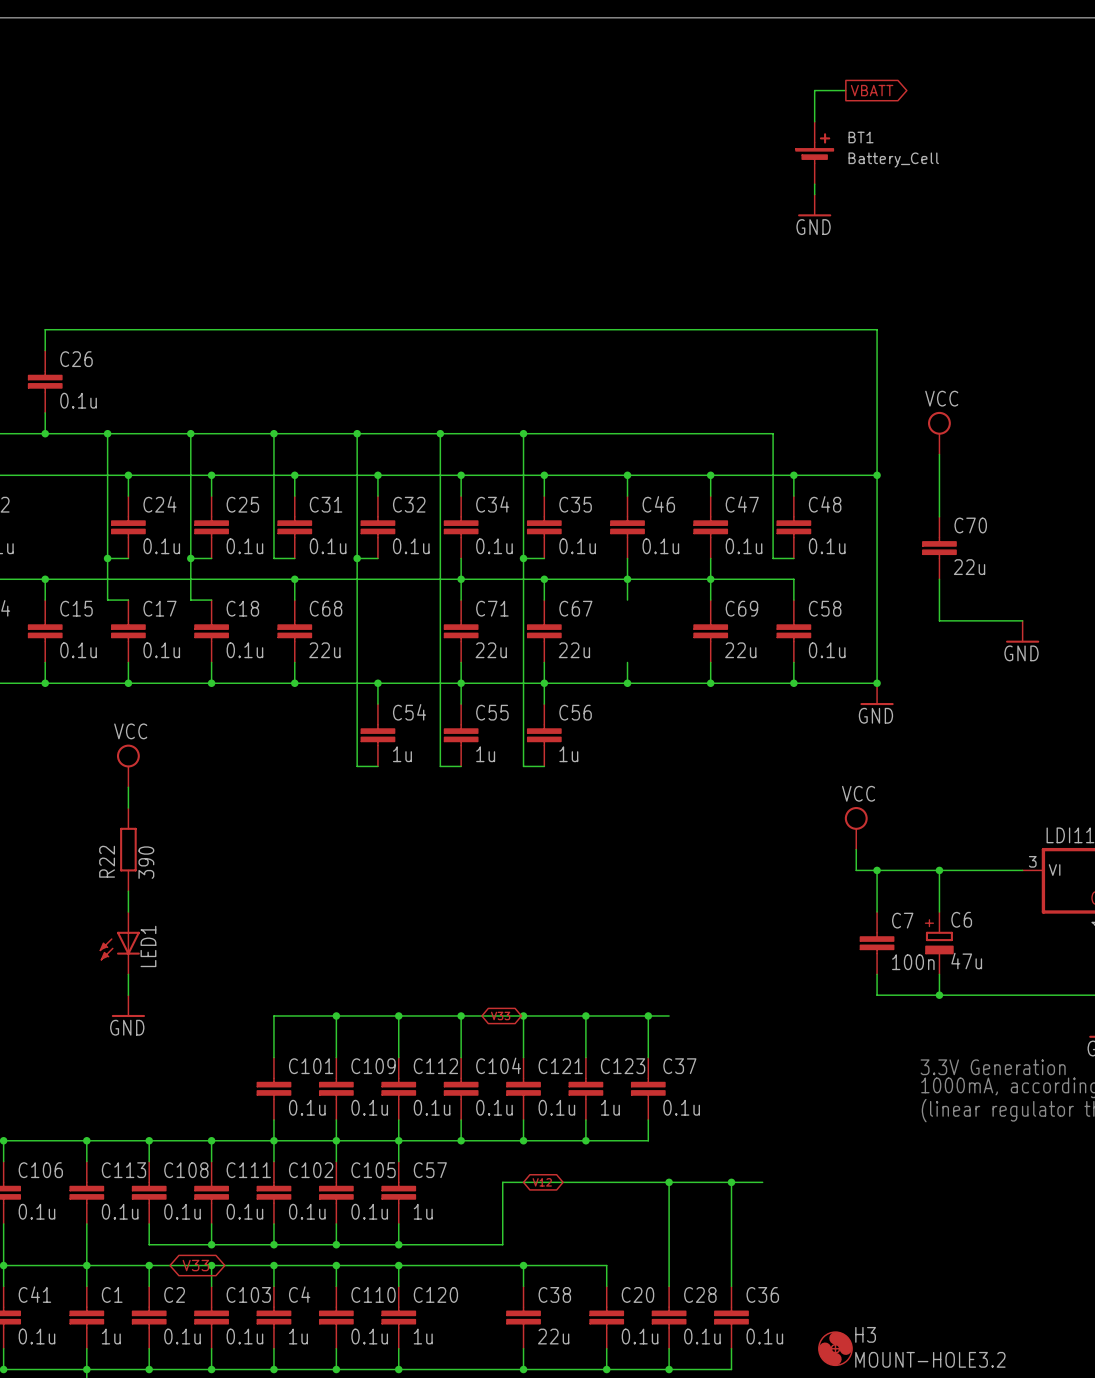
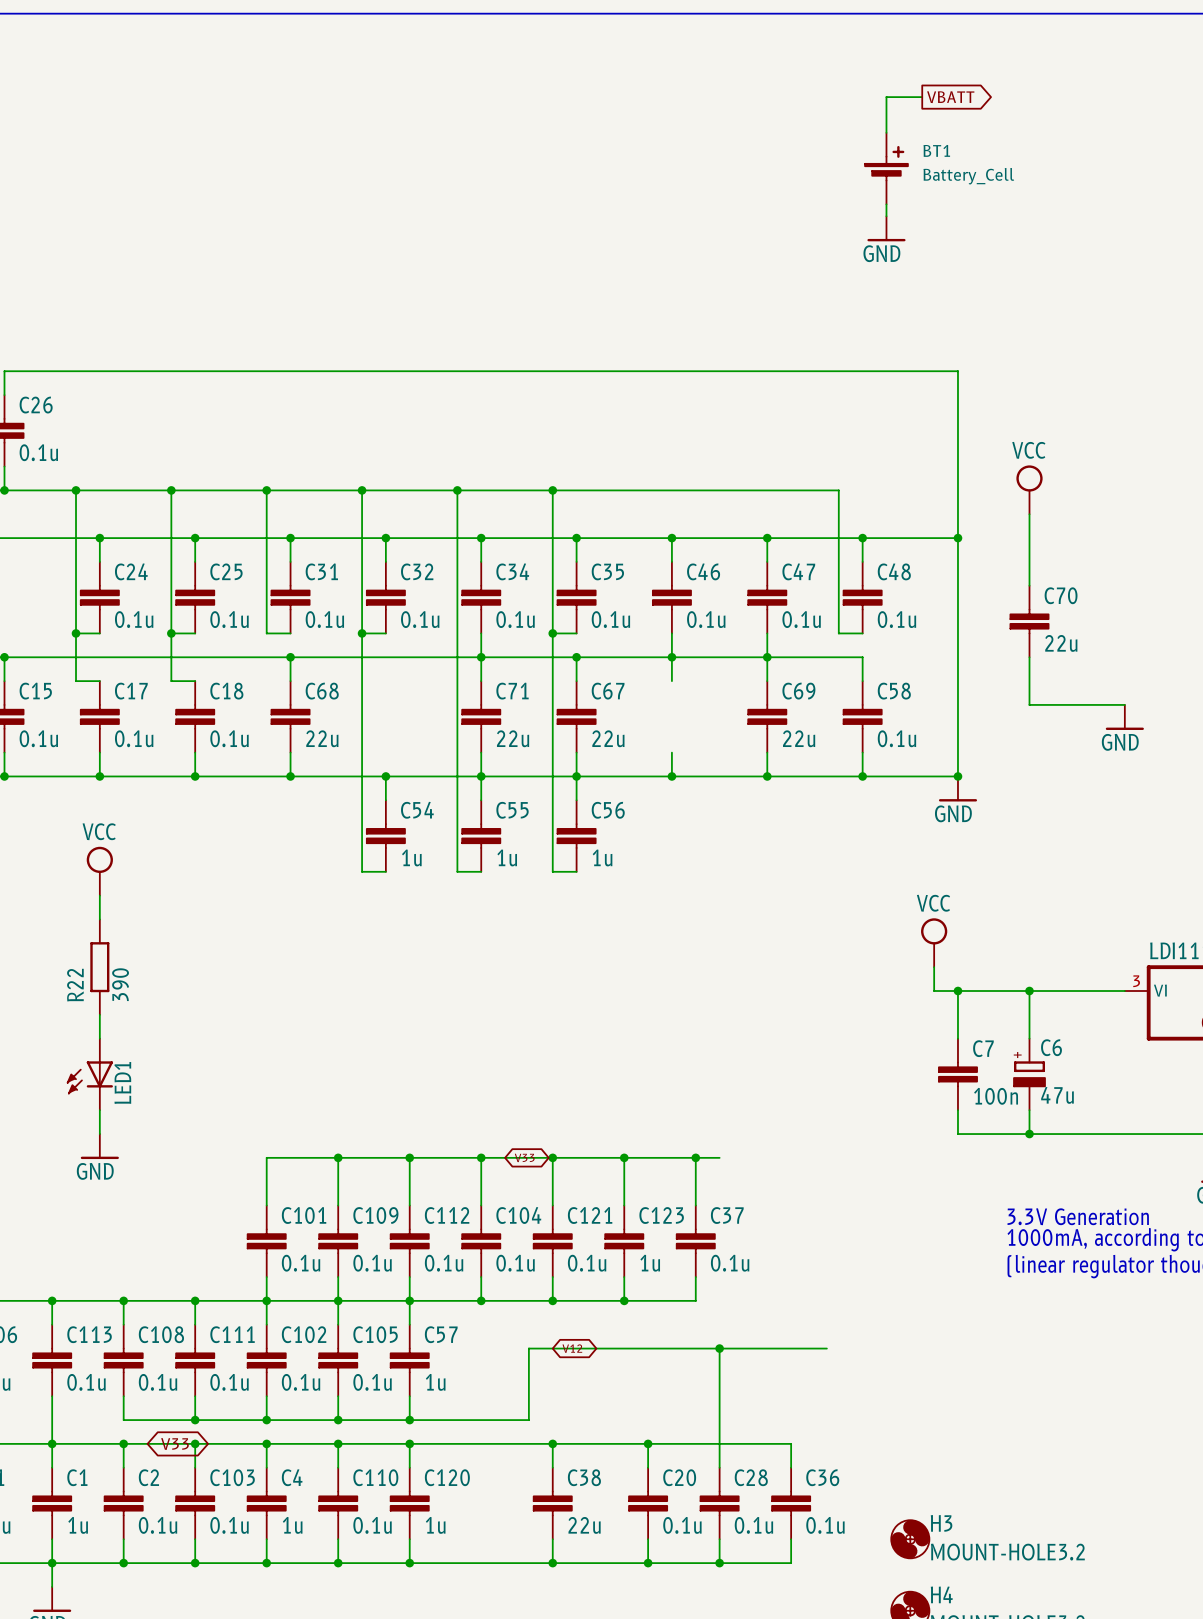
wire: (731, 1182) (731, 1265) -> (648, 1443) (791, 1443)
junction: (731, 1182) -> none
junction: none -> (648, 1443)

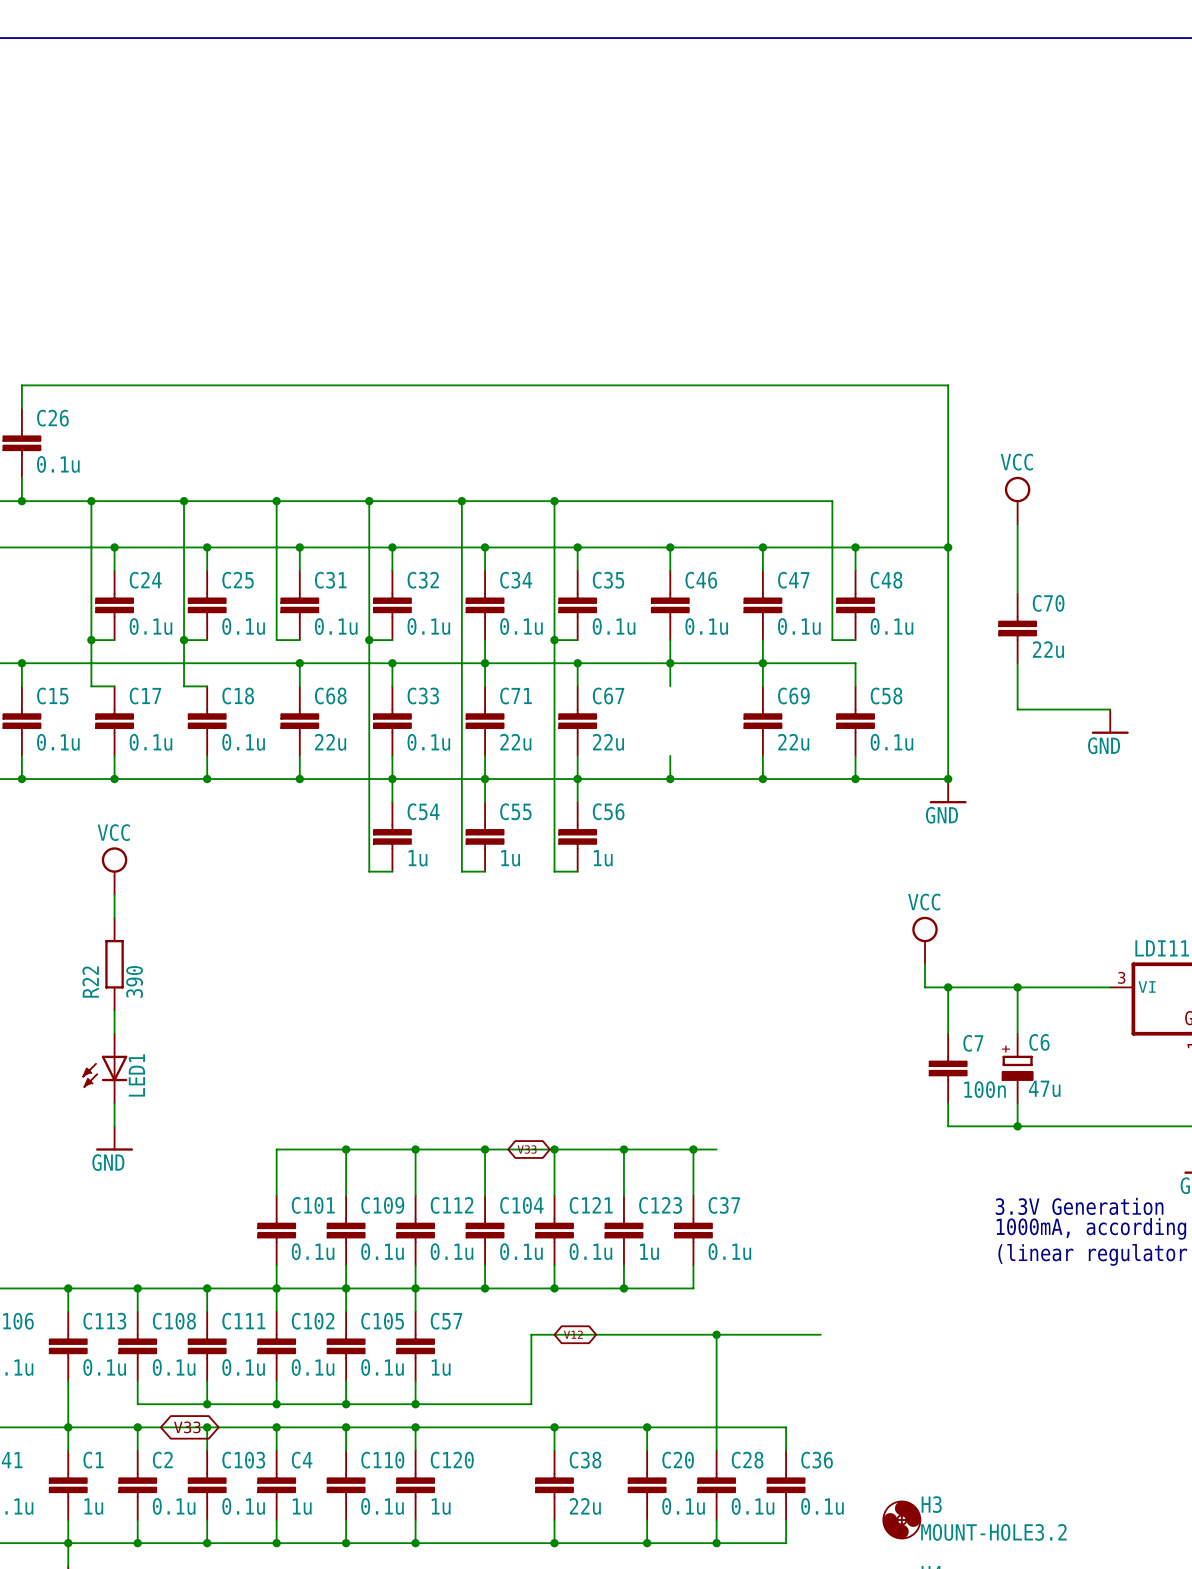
wire: (922, 97) (886, 97) (886, 132) -> none
global label: VBATT (950, 97) -> none
BT1: Battery_Cell (886, 168) -> none
wire: (886, 204) (886, 216) -> none
power symbol: GND (886, 228) -> none
wire: none -> (392, 663) (392, 686)
junction: none -> (392, 663)
C33: none -> 0.1u (392, 721)
wire: none -> (392, 755) (392, 779)

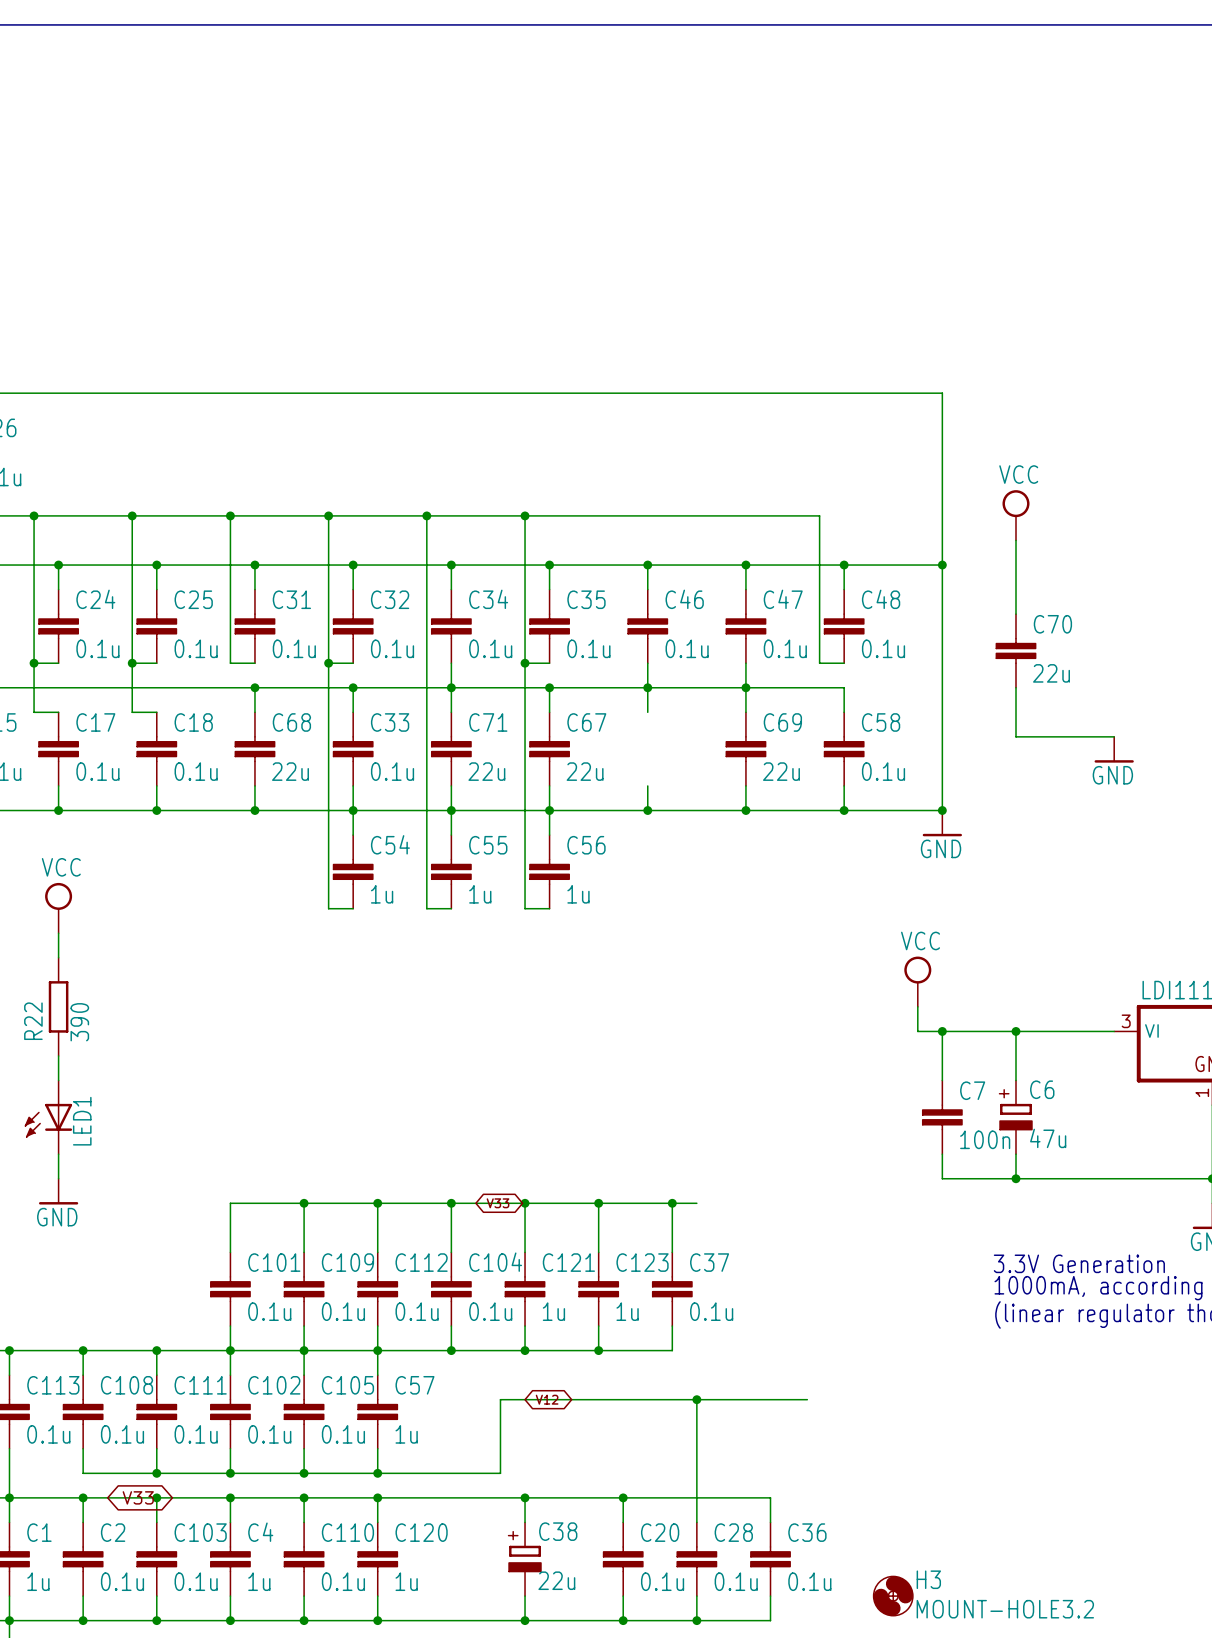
C121 value: 0.1u (590, 1251) -> 1u (553, 1311)
C38 symbol: [535, 1450, 574, 1520] -> [509, 1522, 541, 1597]

